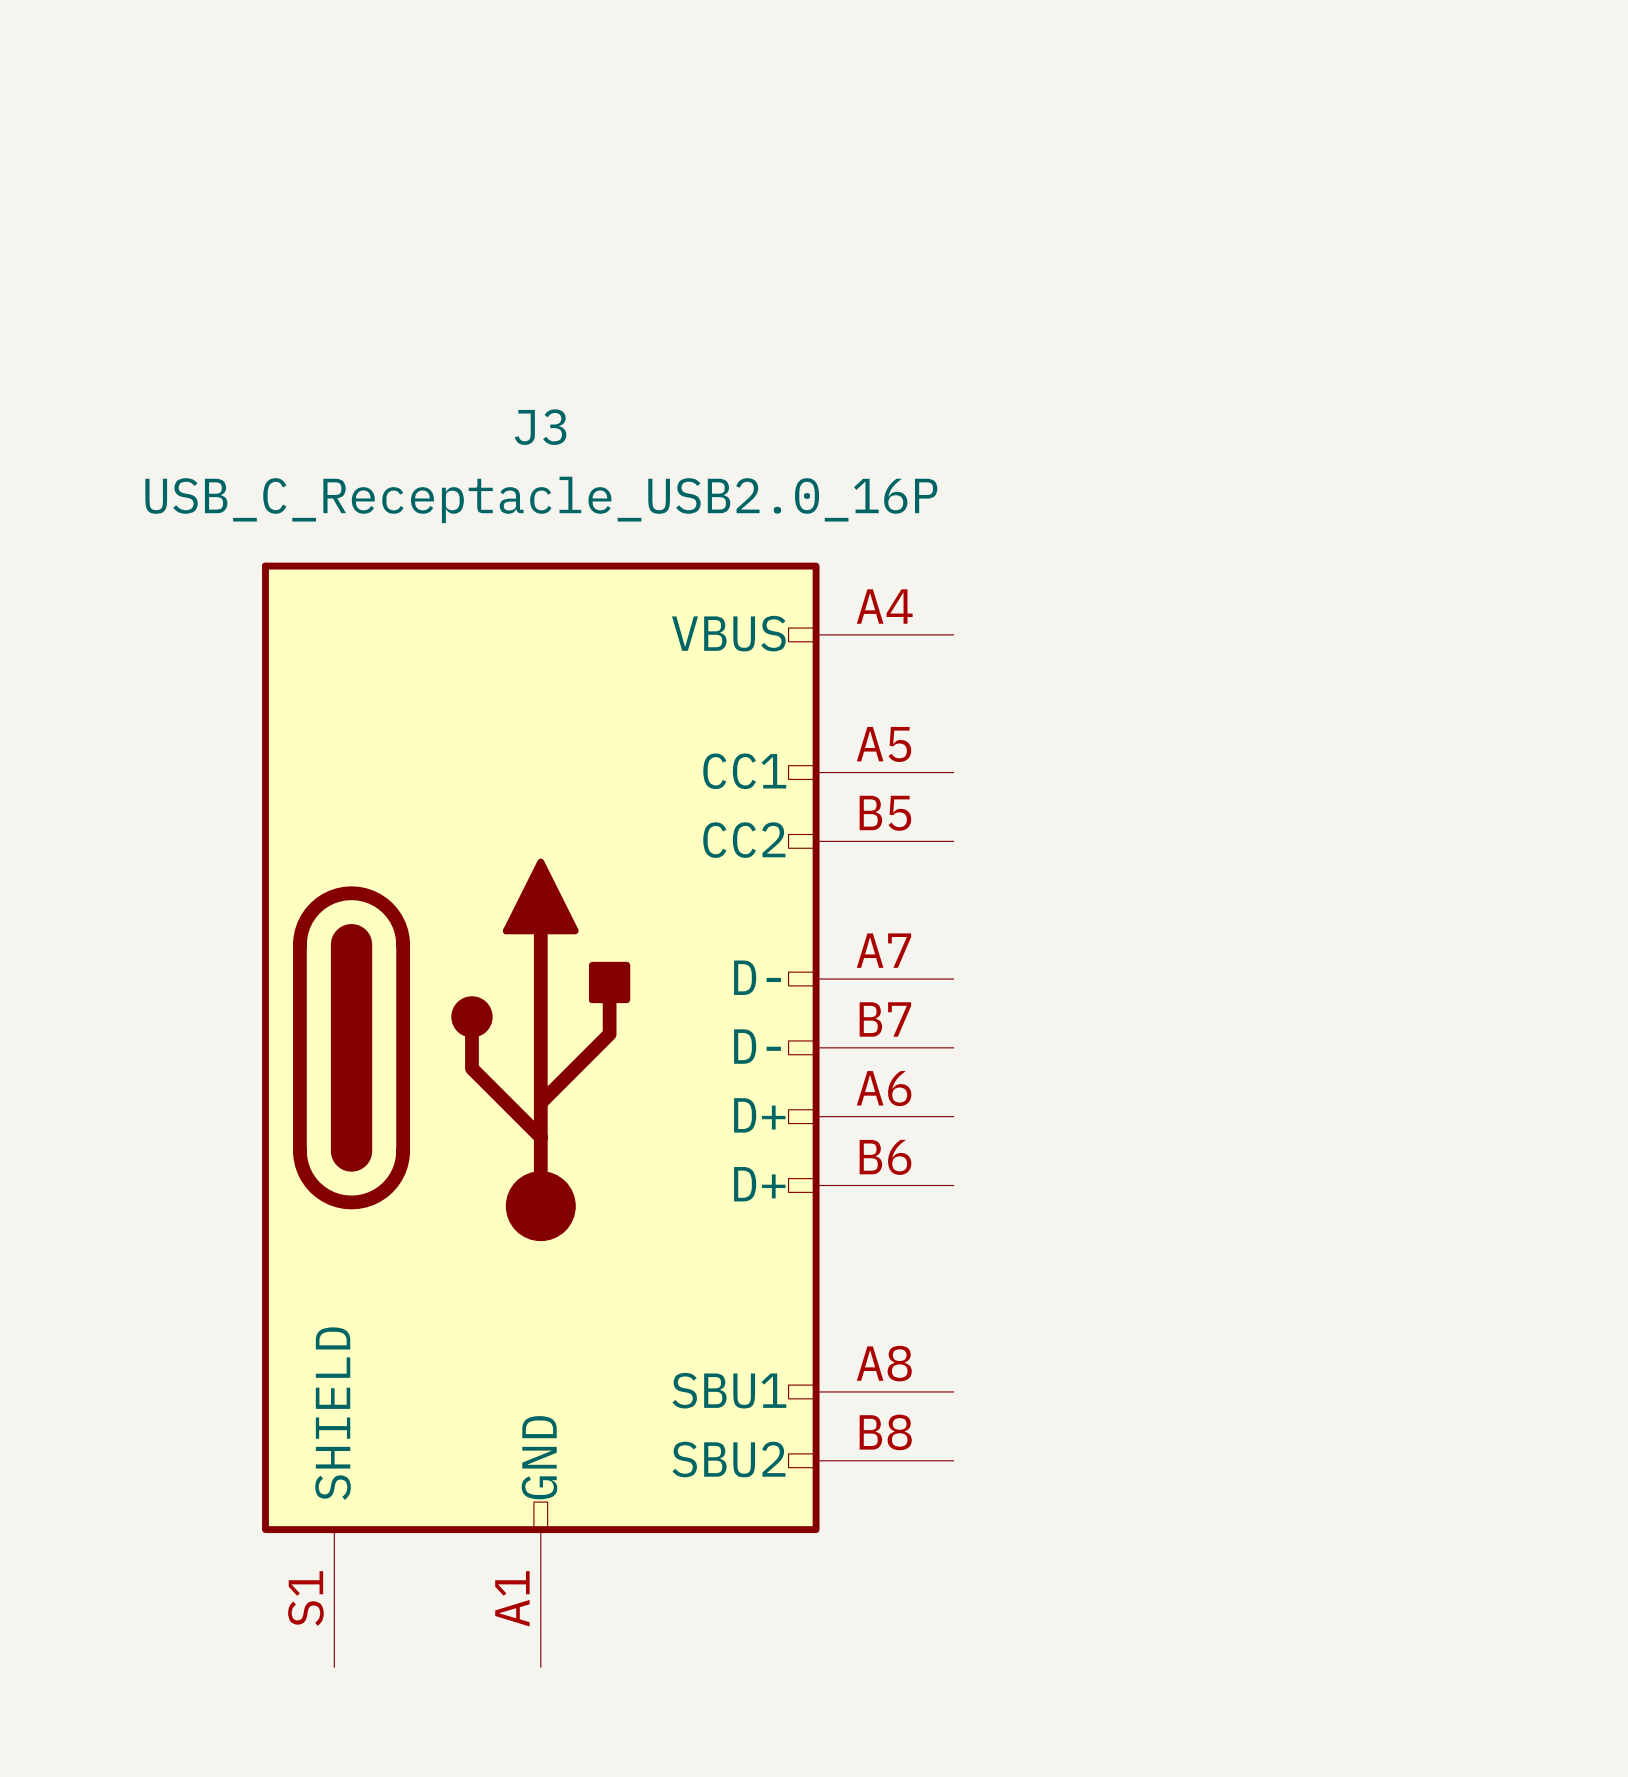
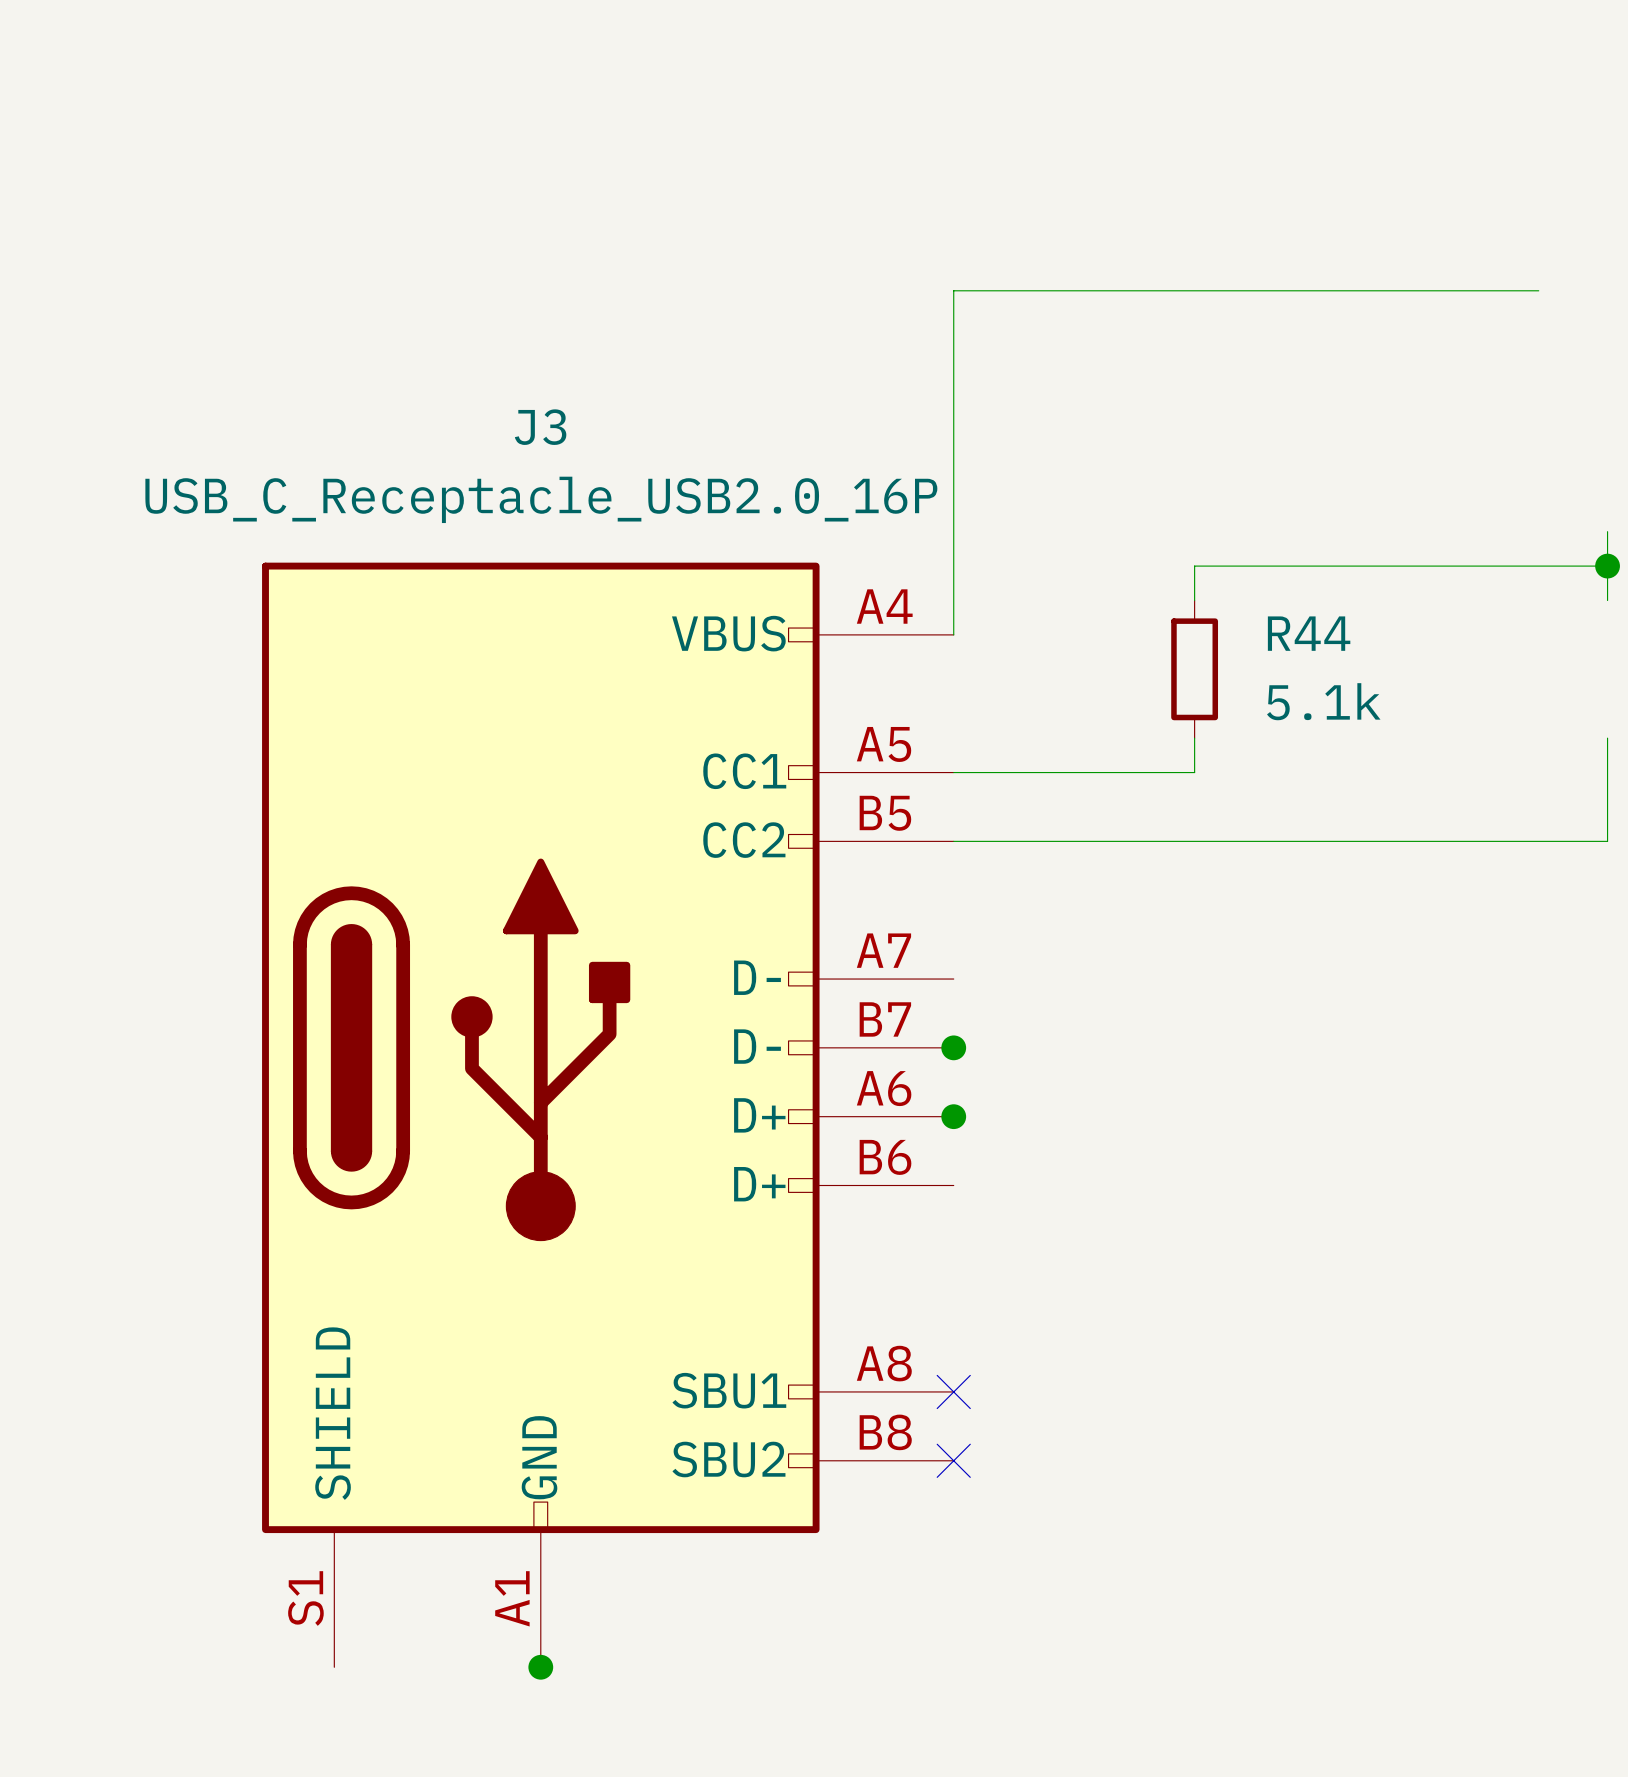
wire: none -> (1538, 290) (953, 290) (953, 634)
wire: none -> (1607, 531) (1607, 600)
wire: none -> (1607, 566) (1194, 566) (1194, 600)
junction: none -> (1607, 566)
R44: none -> 5.1k (1194, 669)
wire: none -> (1194, 738) (1194, 772) (953, 772)
wire: none -> (1607, 738) (1607, 841) (953, 841)
junction: none -> (953, 1047)
junction: none -> (953, 1116)
no-connect mark: none -> (953, 1391)
no-connect mark: none -> (953, 1460)
junction: none -> (540, 1667)

